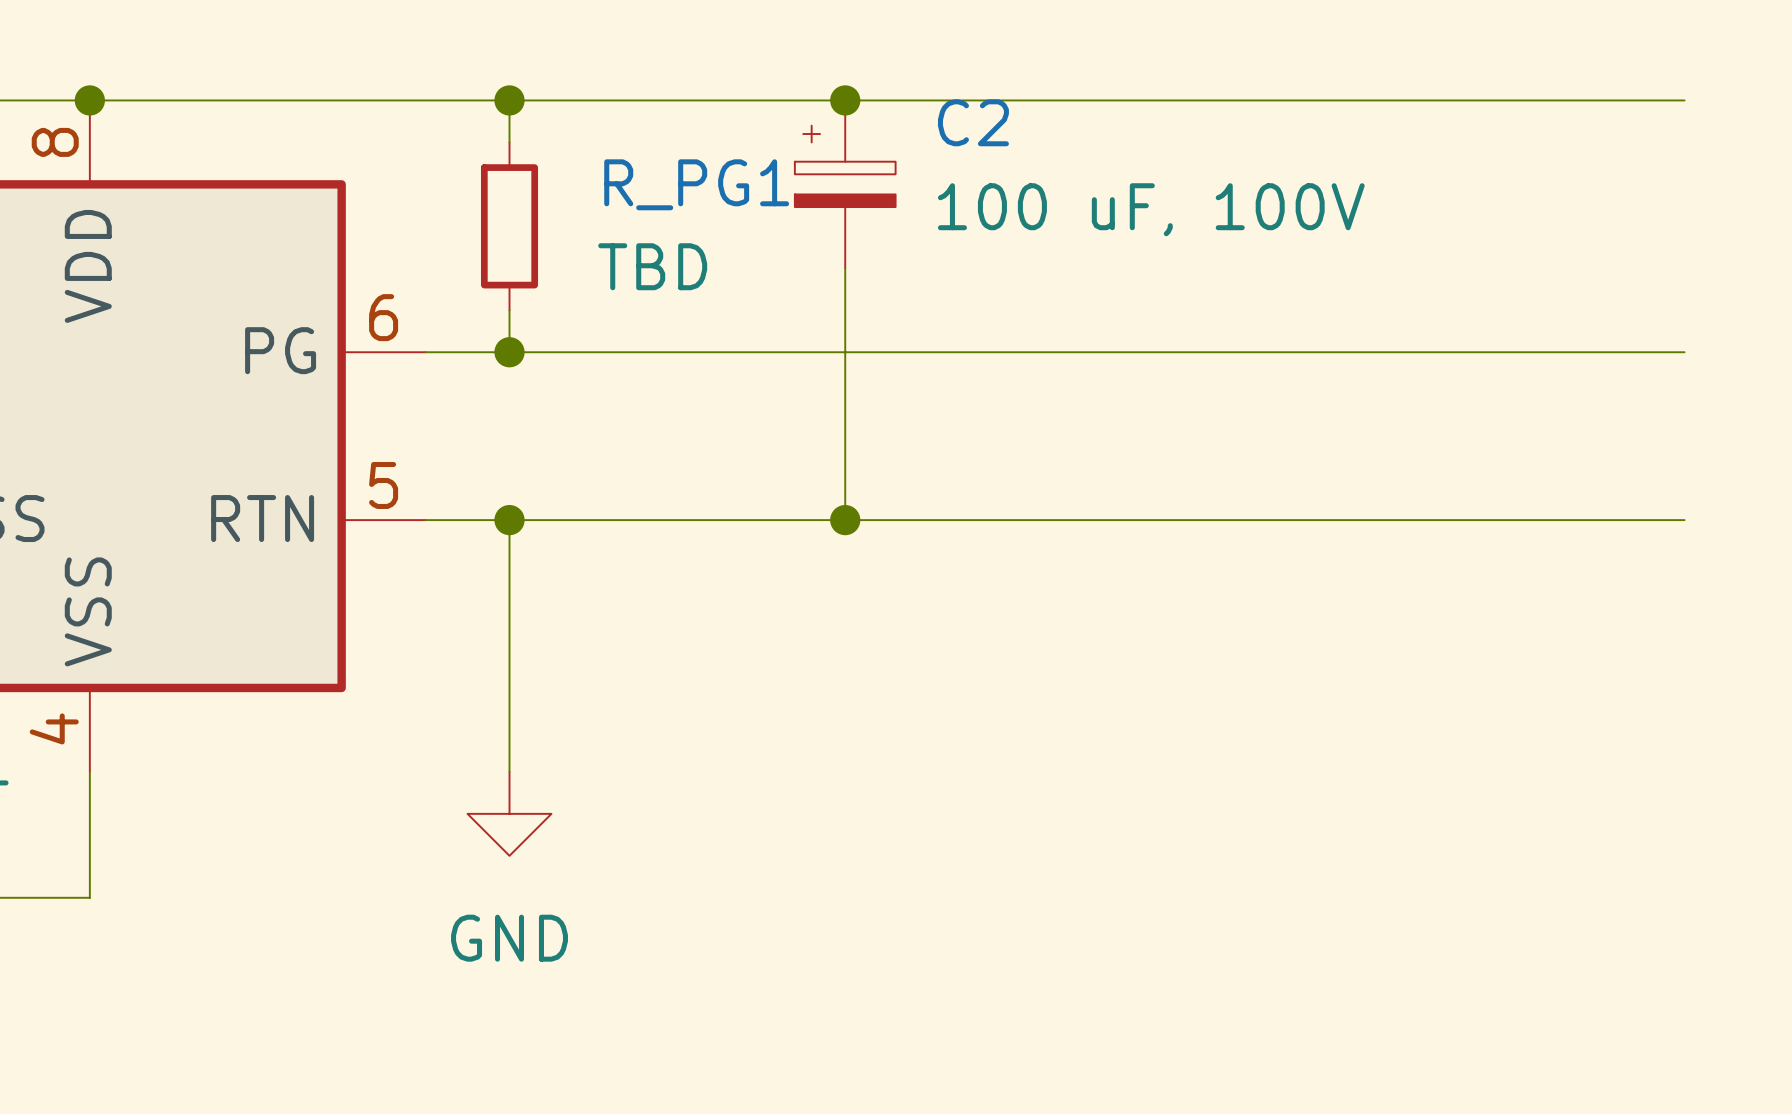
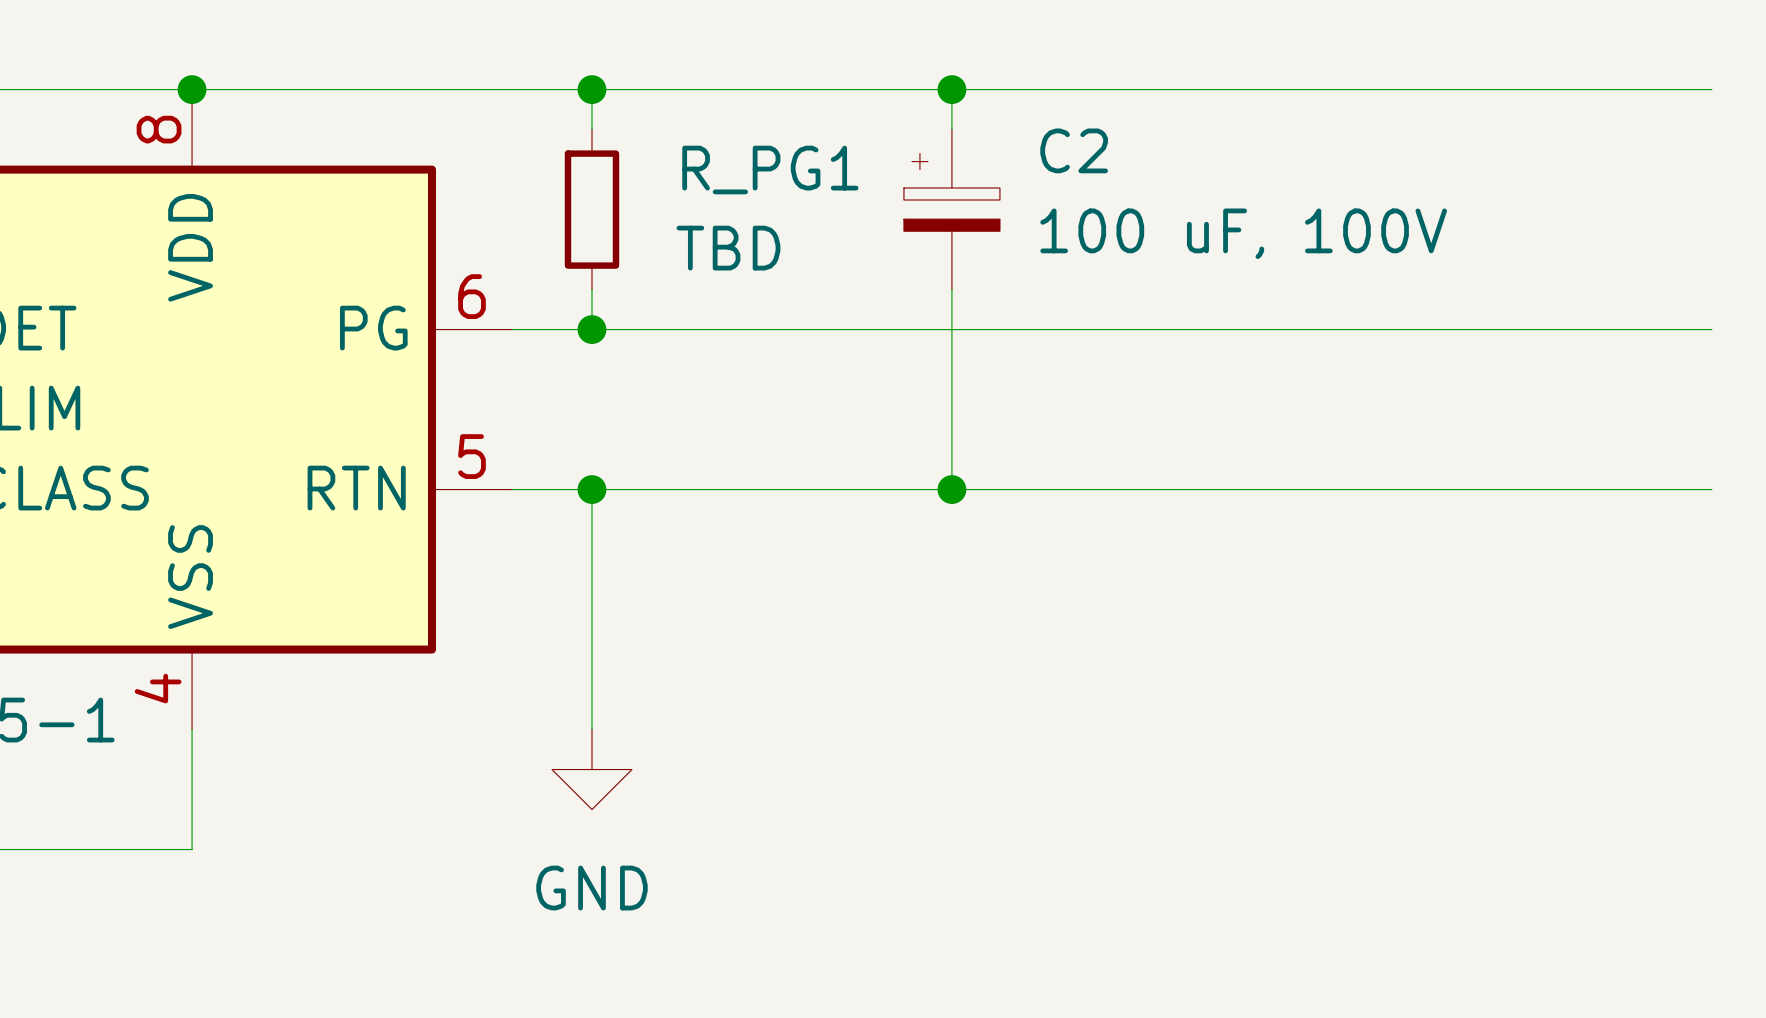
junction position: (845, 100) -> (951, 89)
wire: none -> (951, 89) (951, 129)
C2 position: (845, 184) -> (951, 209)
wire: (845, 268) (845, 520) -> none
wire: none -> (951, 289) (951, 489)
junction position: (845, 520) -> (951, 489)

